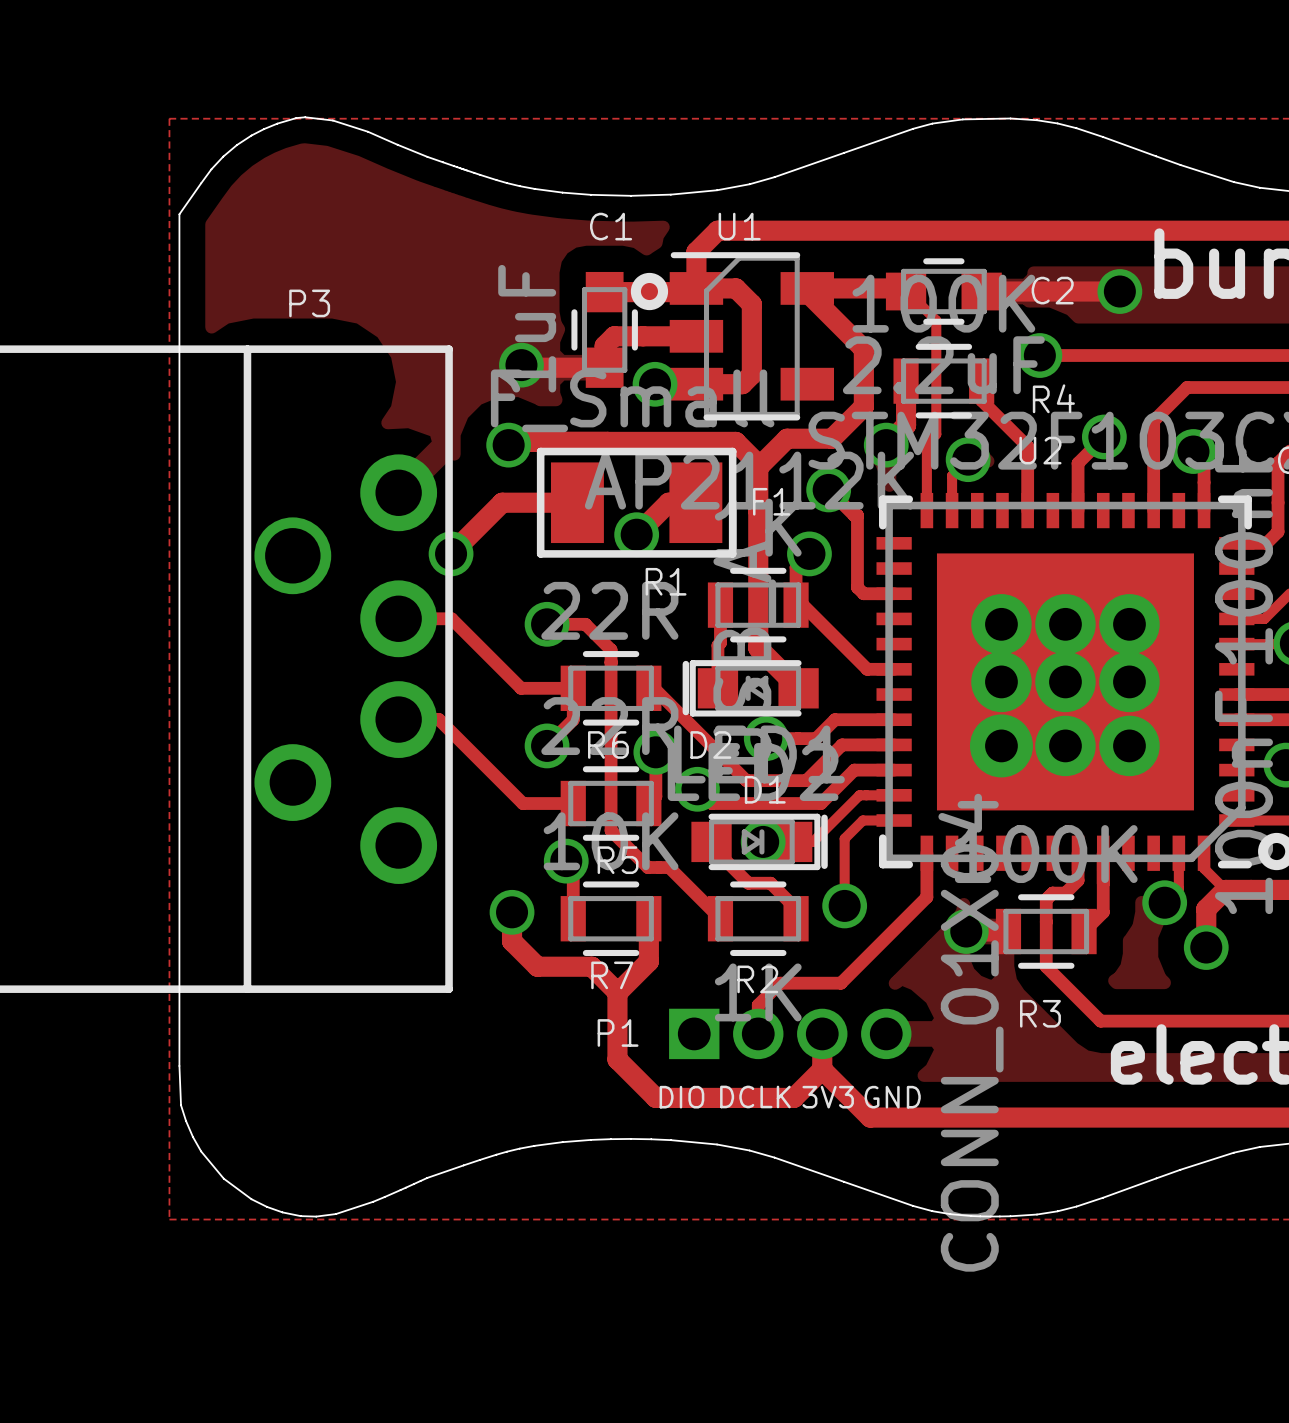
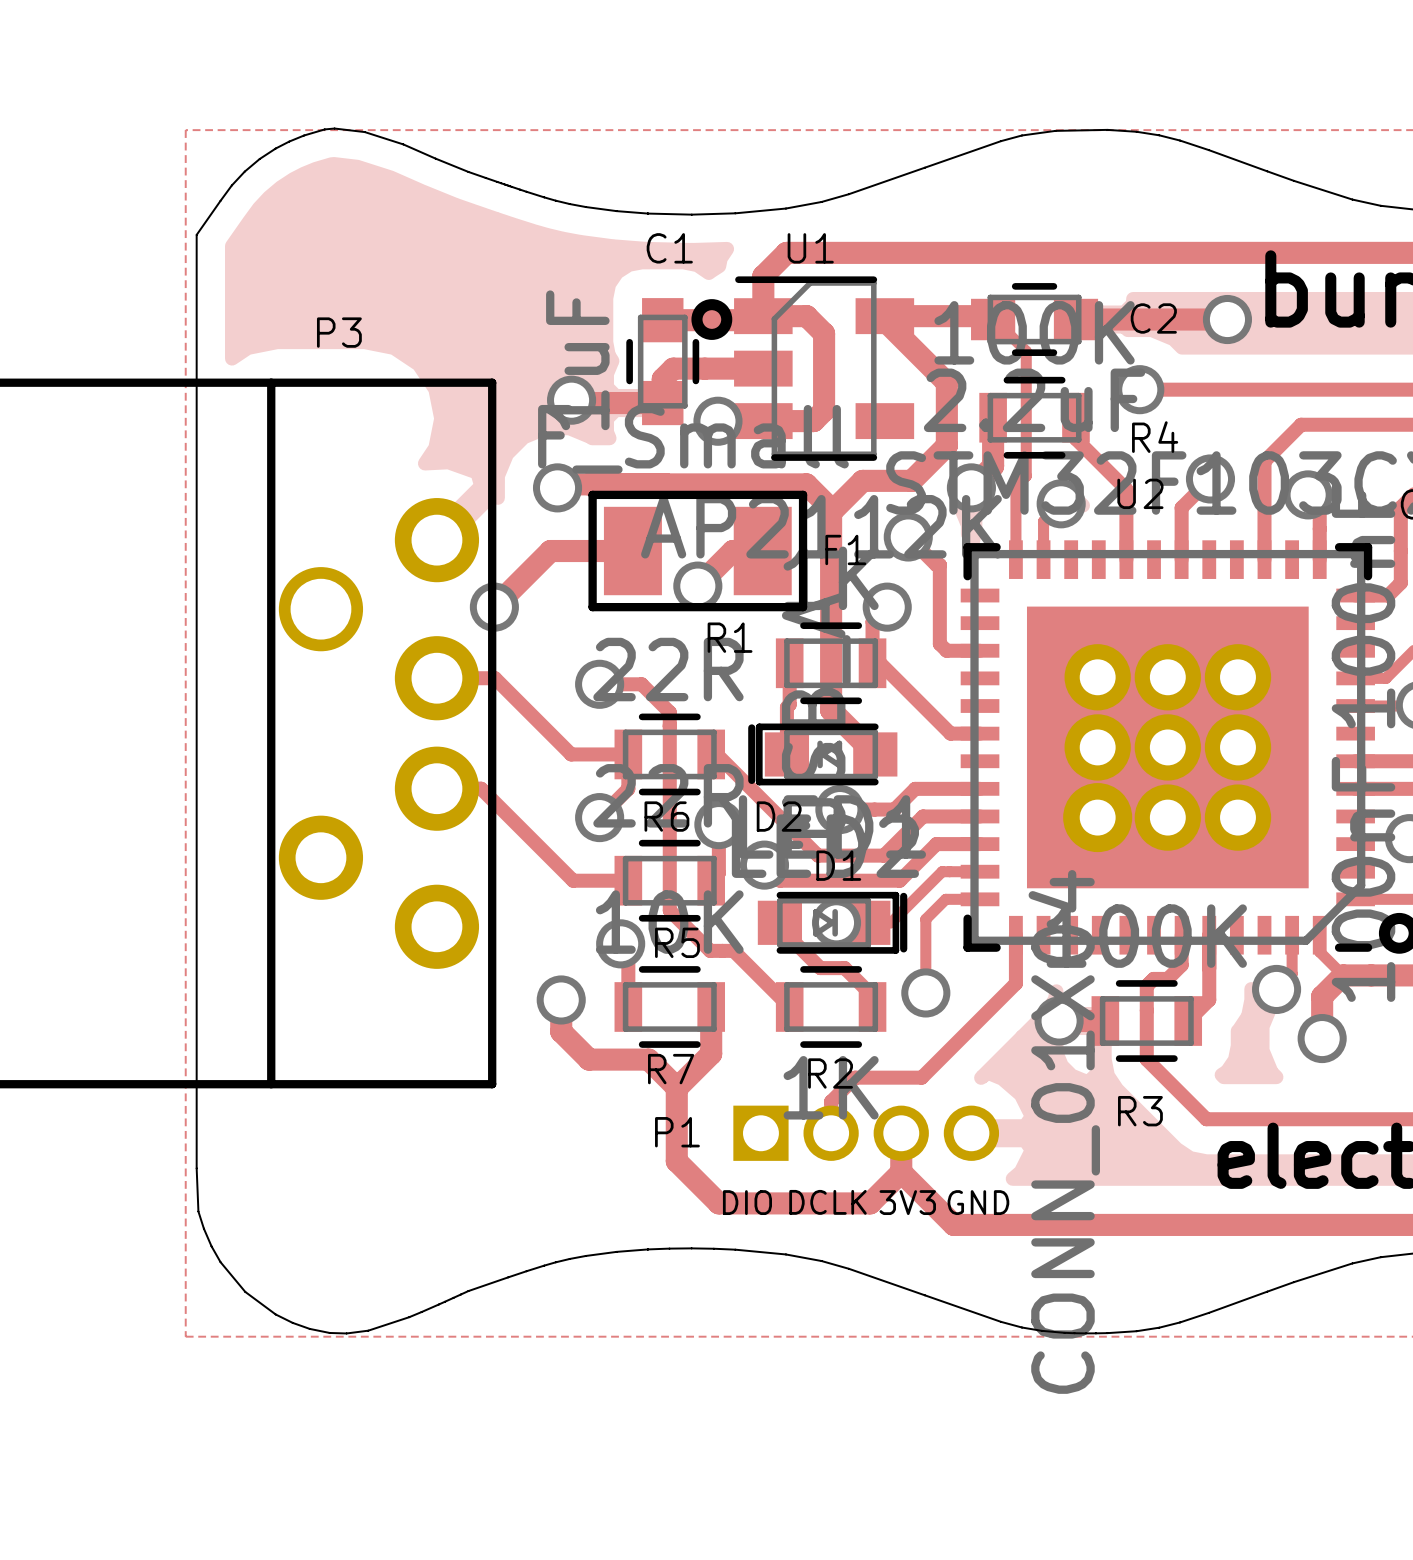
U2 footprint: [876, 492, 1255, 871] -> [960, 540, 1375, 955]

